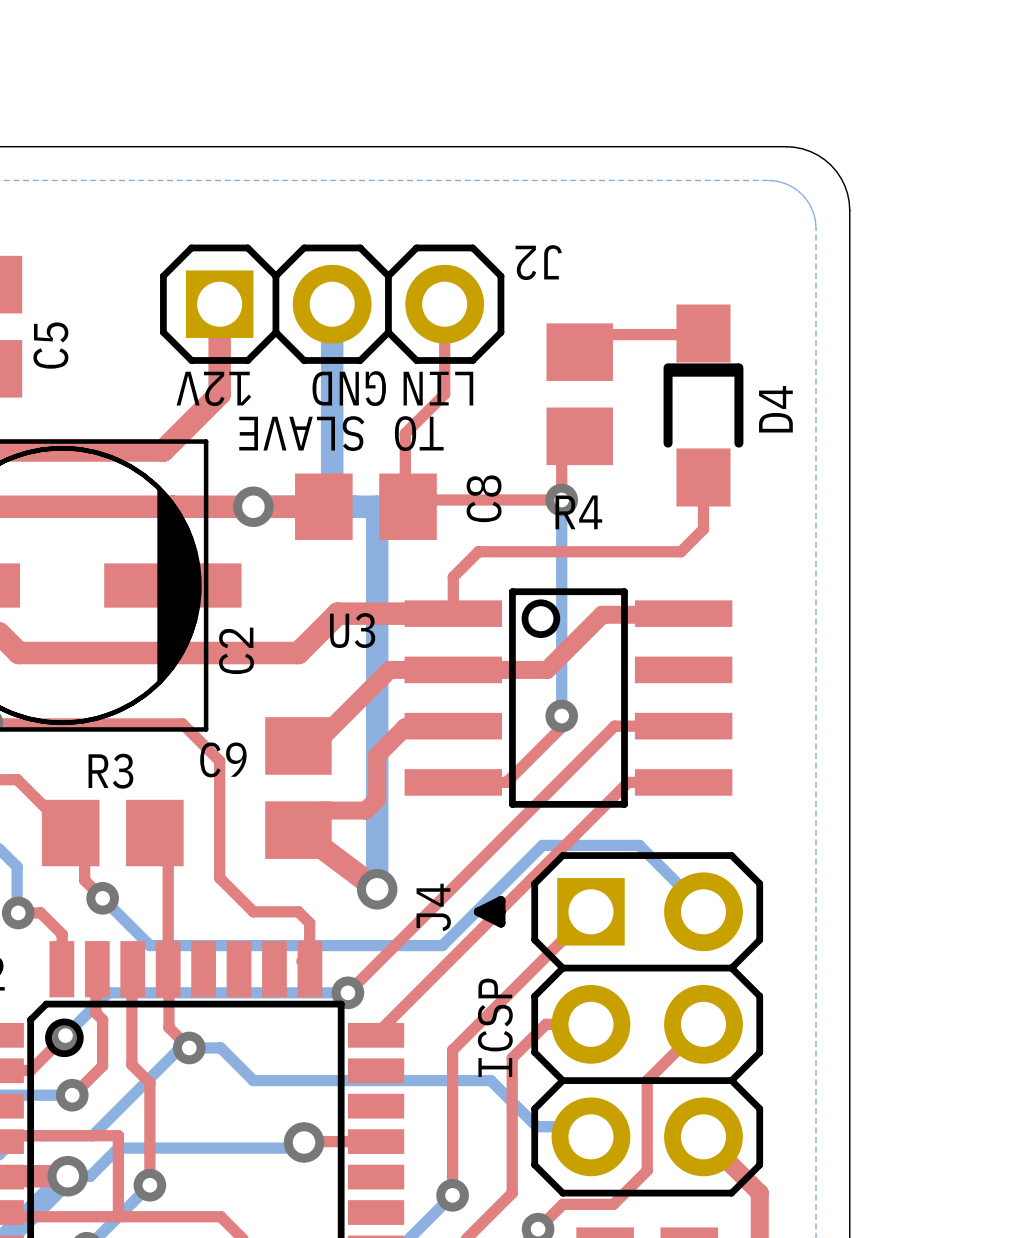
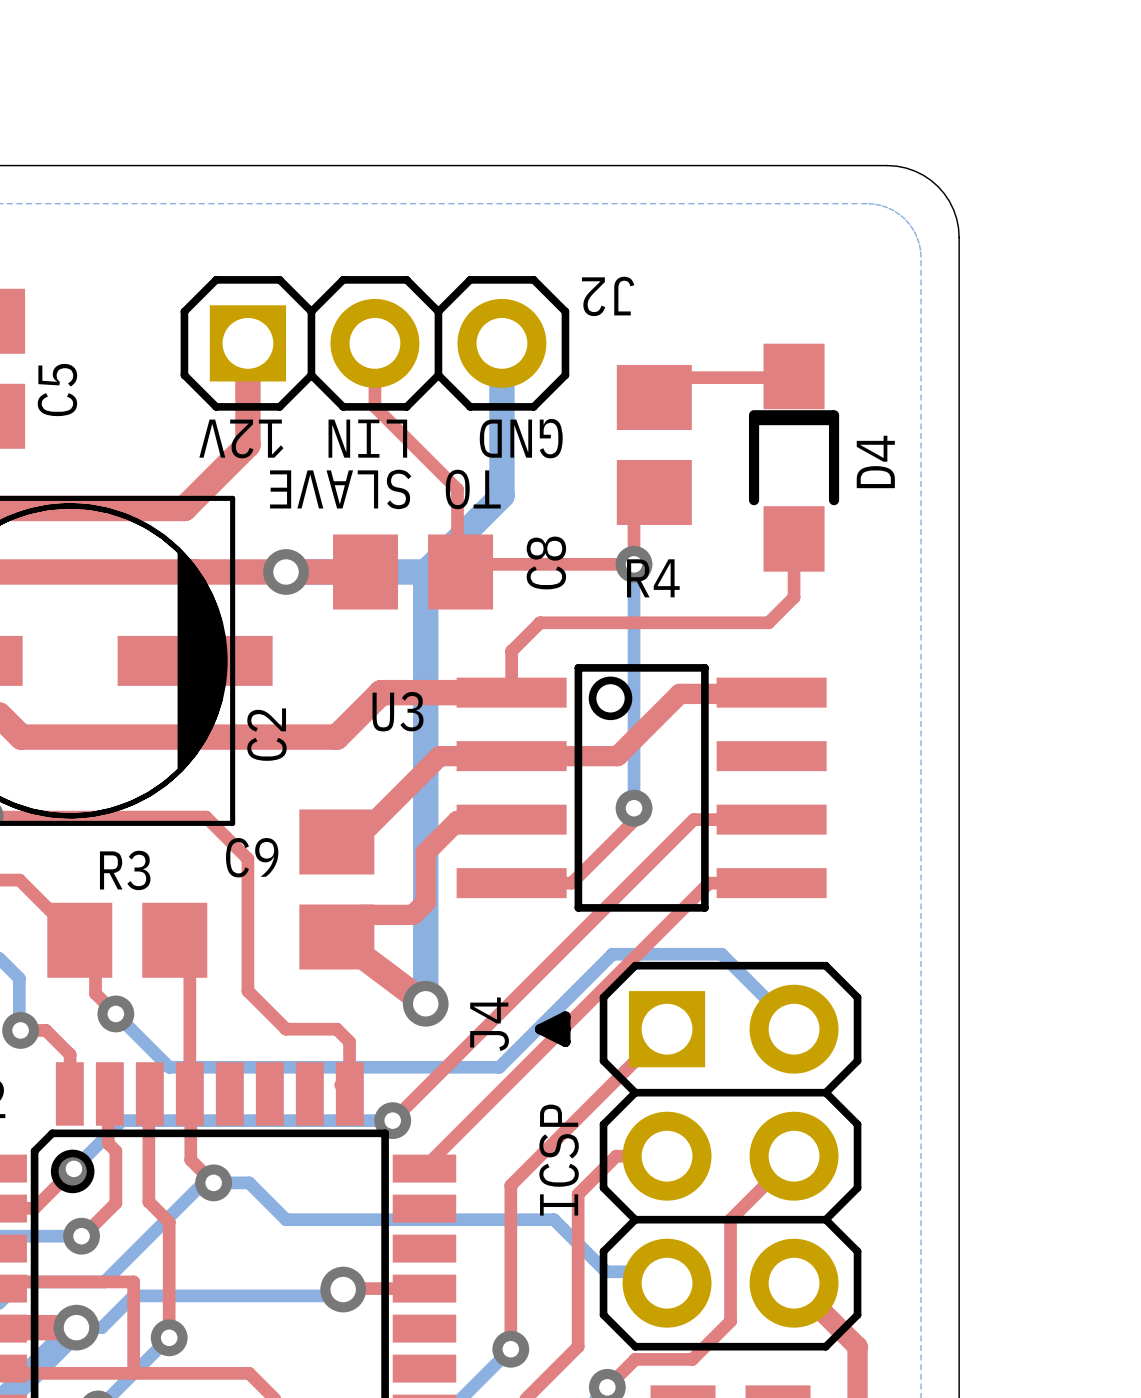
bottom track: (332, 304) (332, 506) -> none
top track: (444, 304) (444, 394) (405, 433) -> (374, 343) (374, 406) (457, 489)
bottom track: none -> (501, 343) (501, 495) (425, 571)
text: GND (349, 388) -> LIN (367, 438)
text: LIN (438, 388) -> GND (521, 438)

